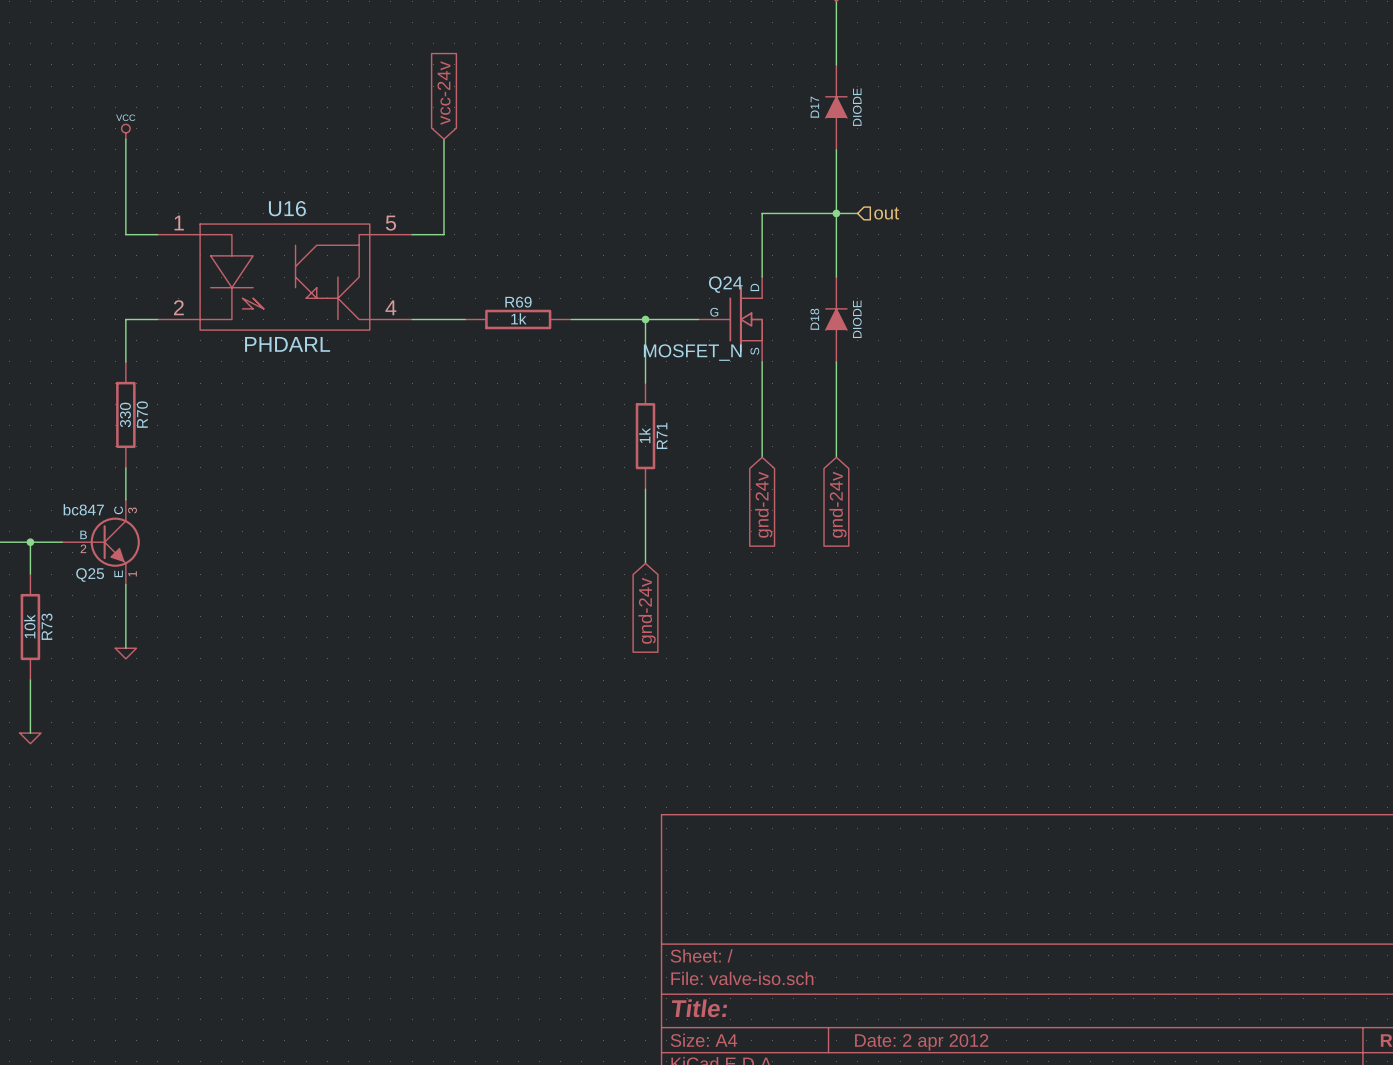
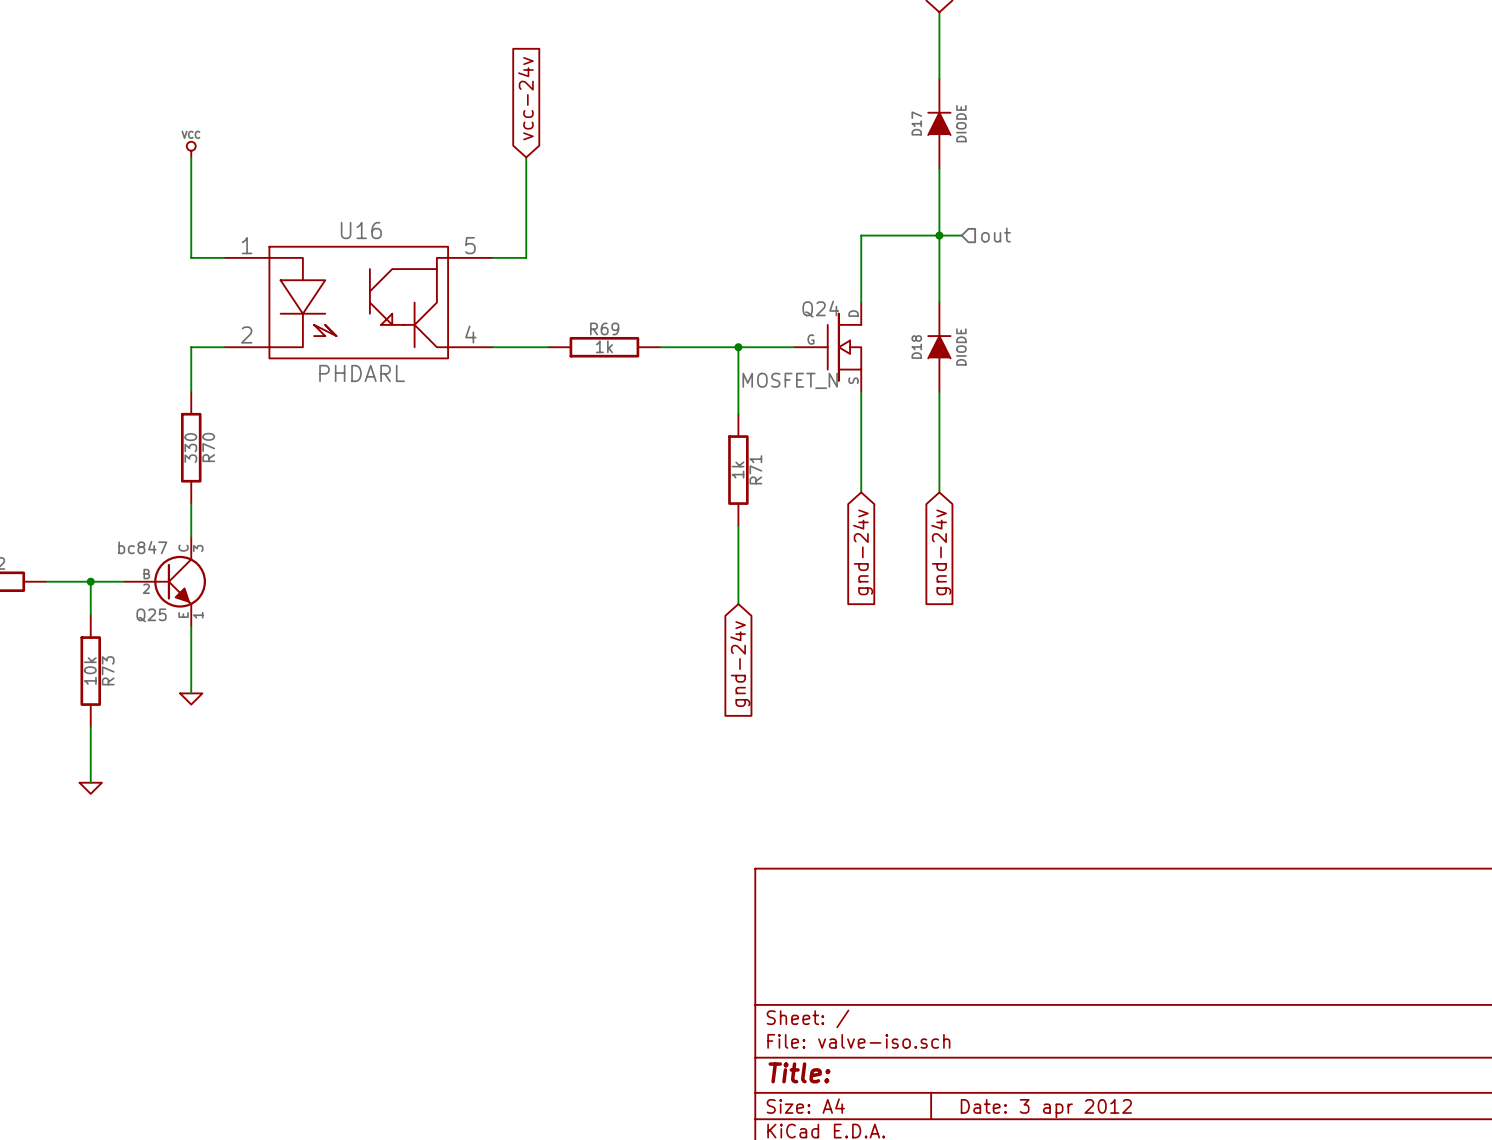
title block: Date: 2 apr 2012 (921, 1042) -> Date: 3 apr 2012 (1046, 1108)

